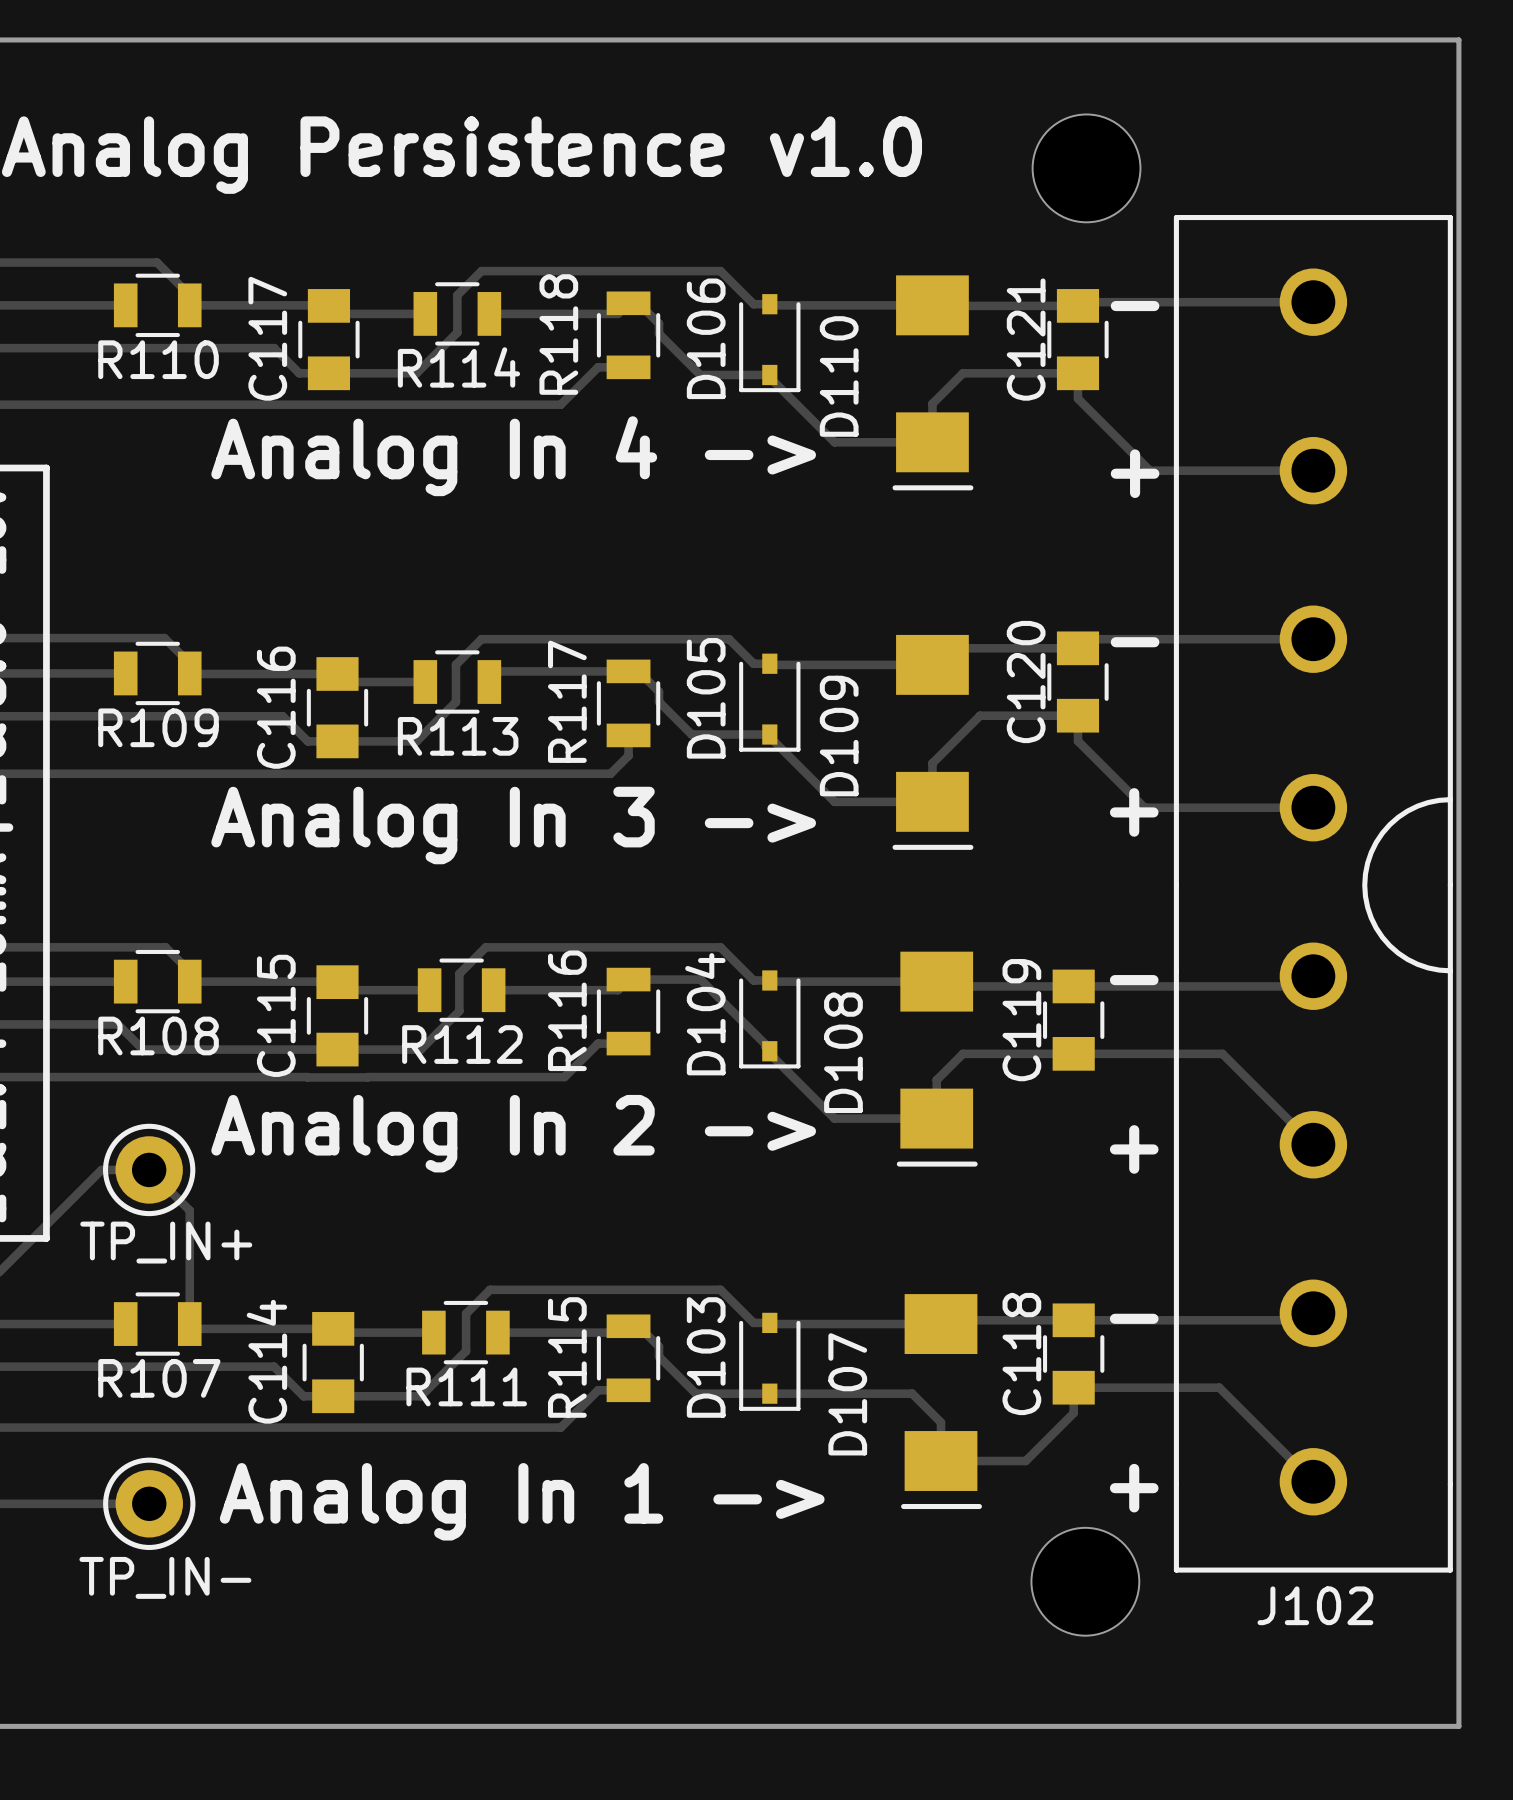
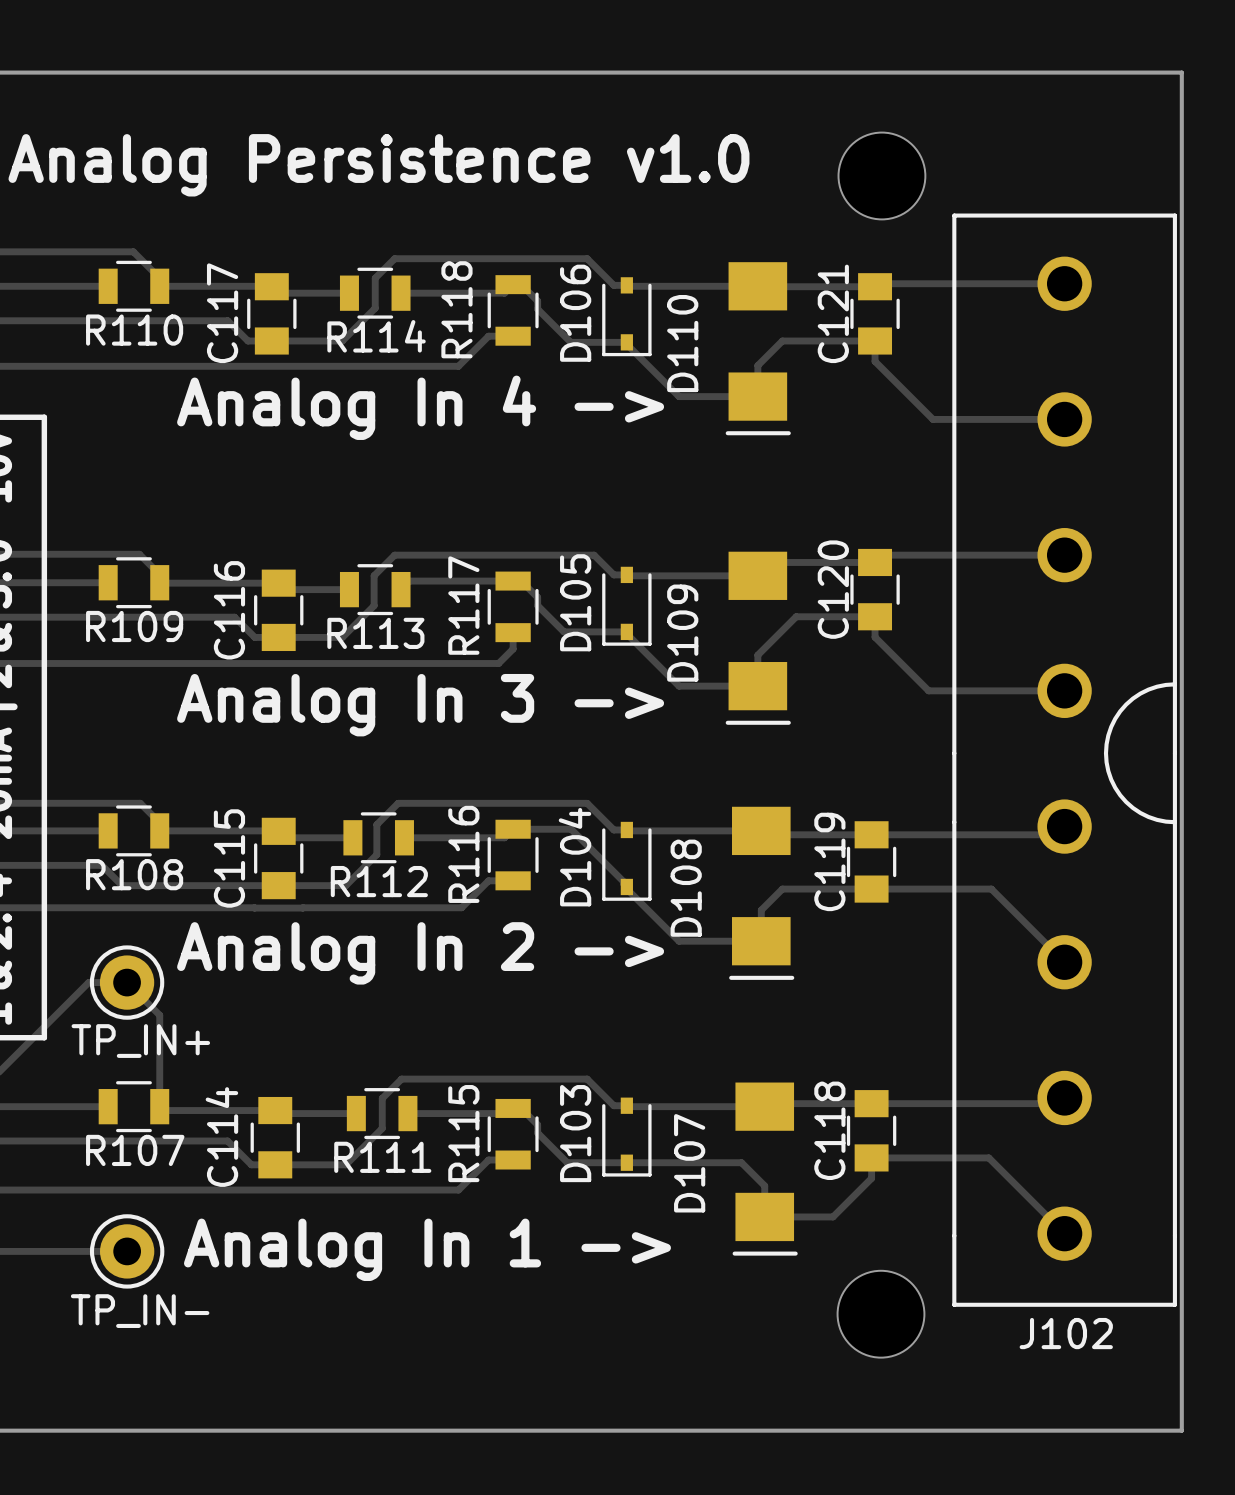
text: - (1135, 306) -> none
text: + (1135, 473) -> none
text: - (1135, 642) -> none
text: + (1134, 812) -> none
text: - (1134, 980) -> none
text: + (1134, 1149) -> none
text: - (1134, 1318) -> none
text: + (1134, 1488) -> none

